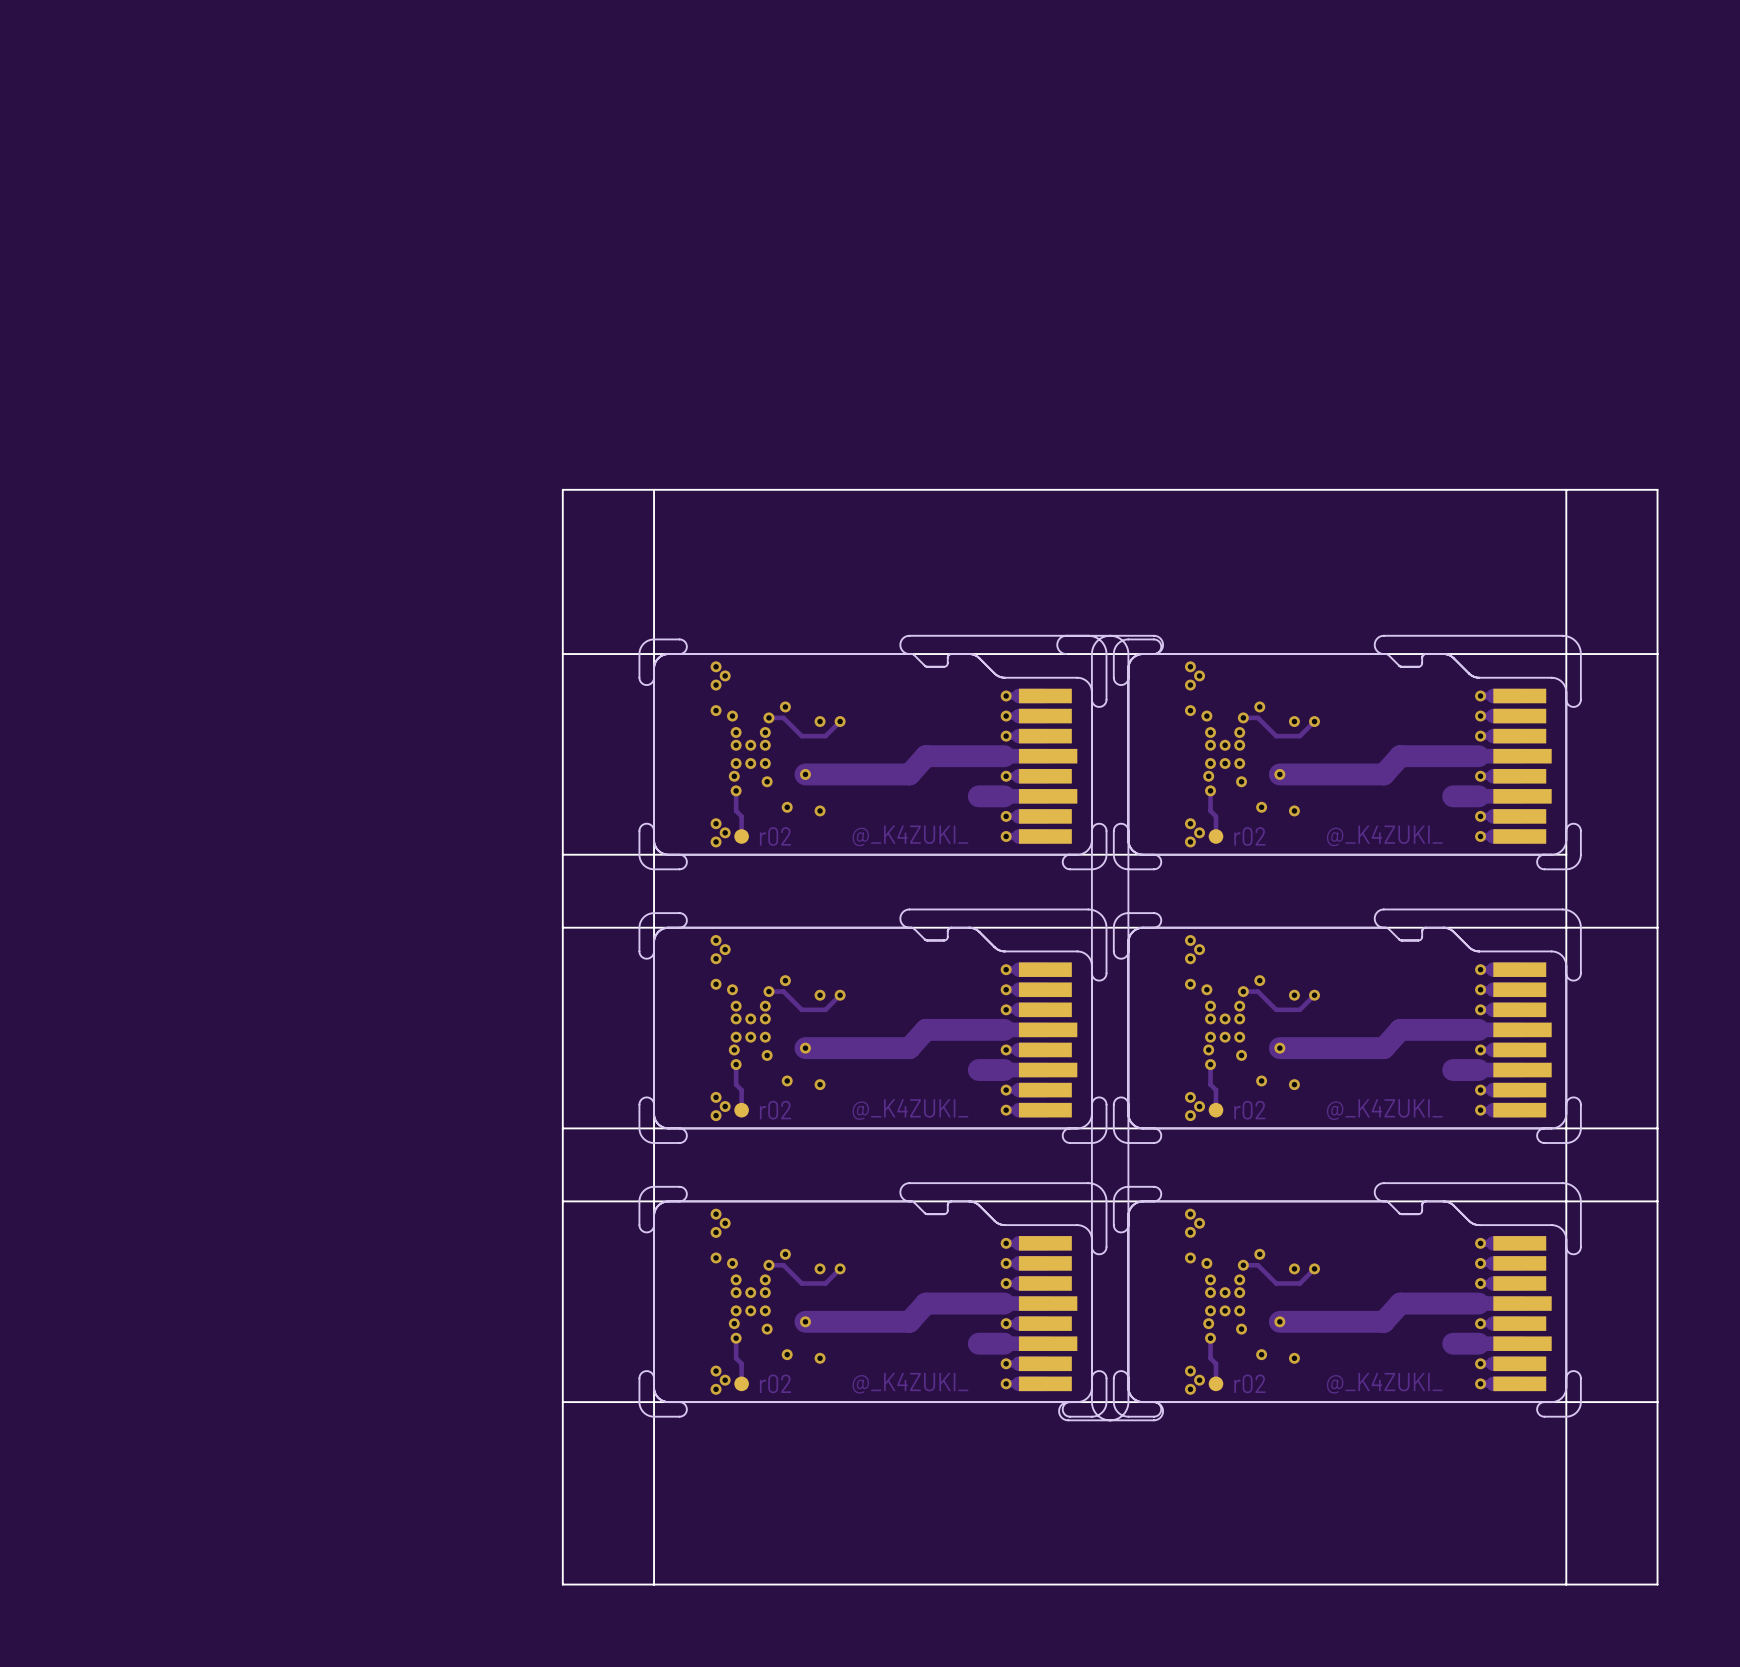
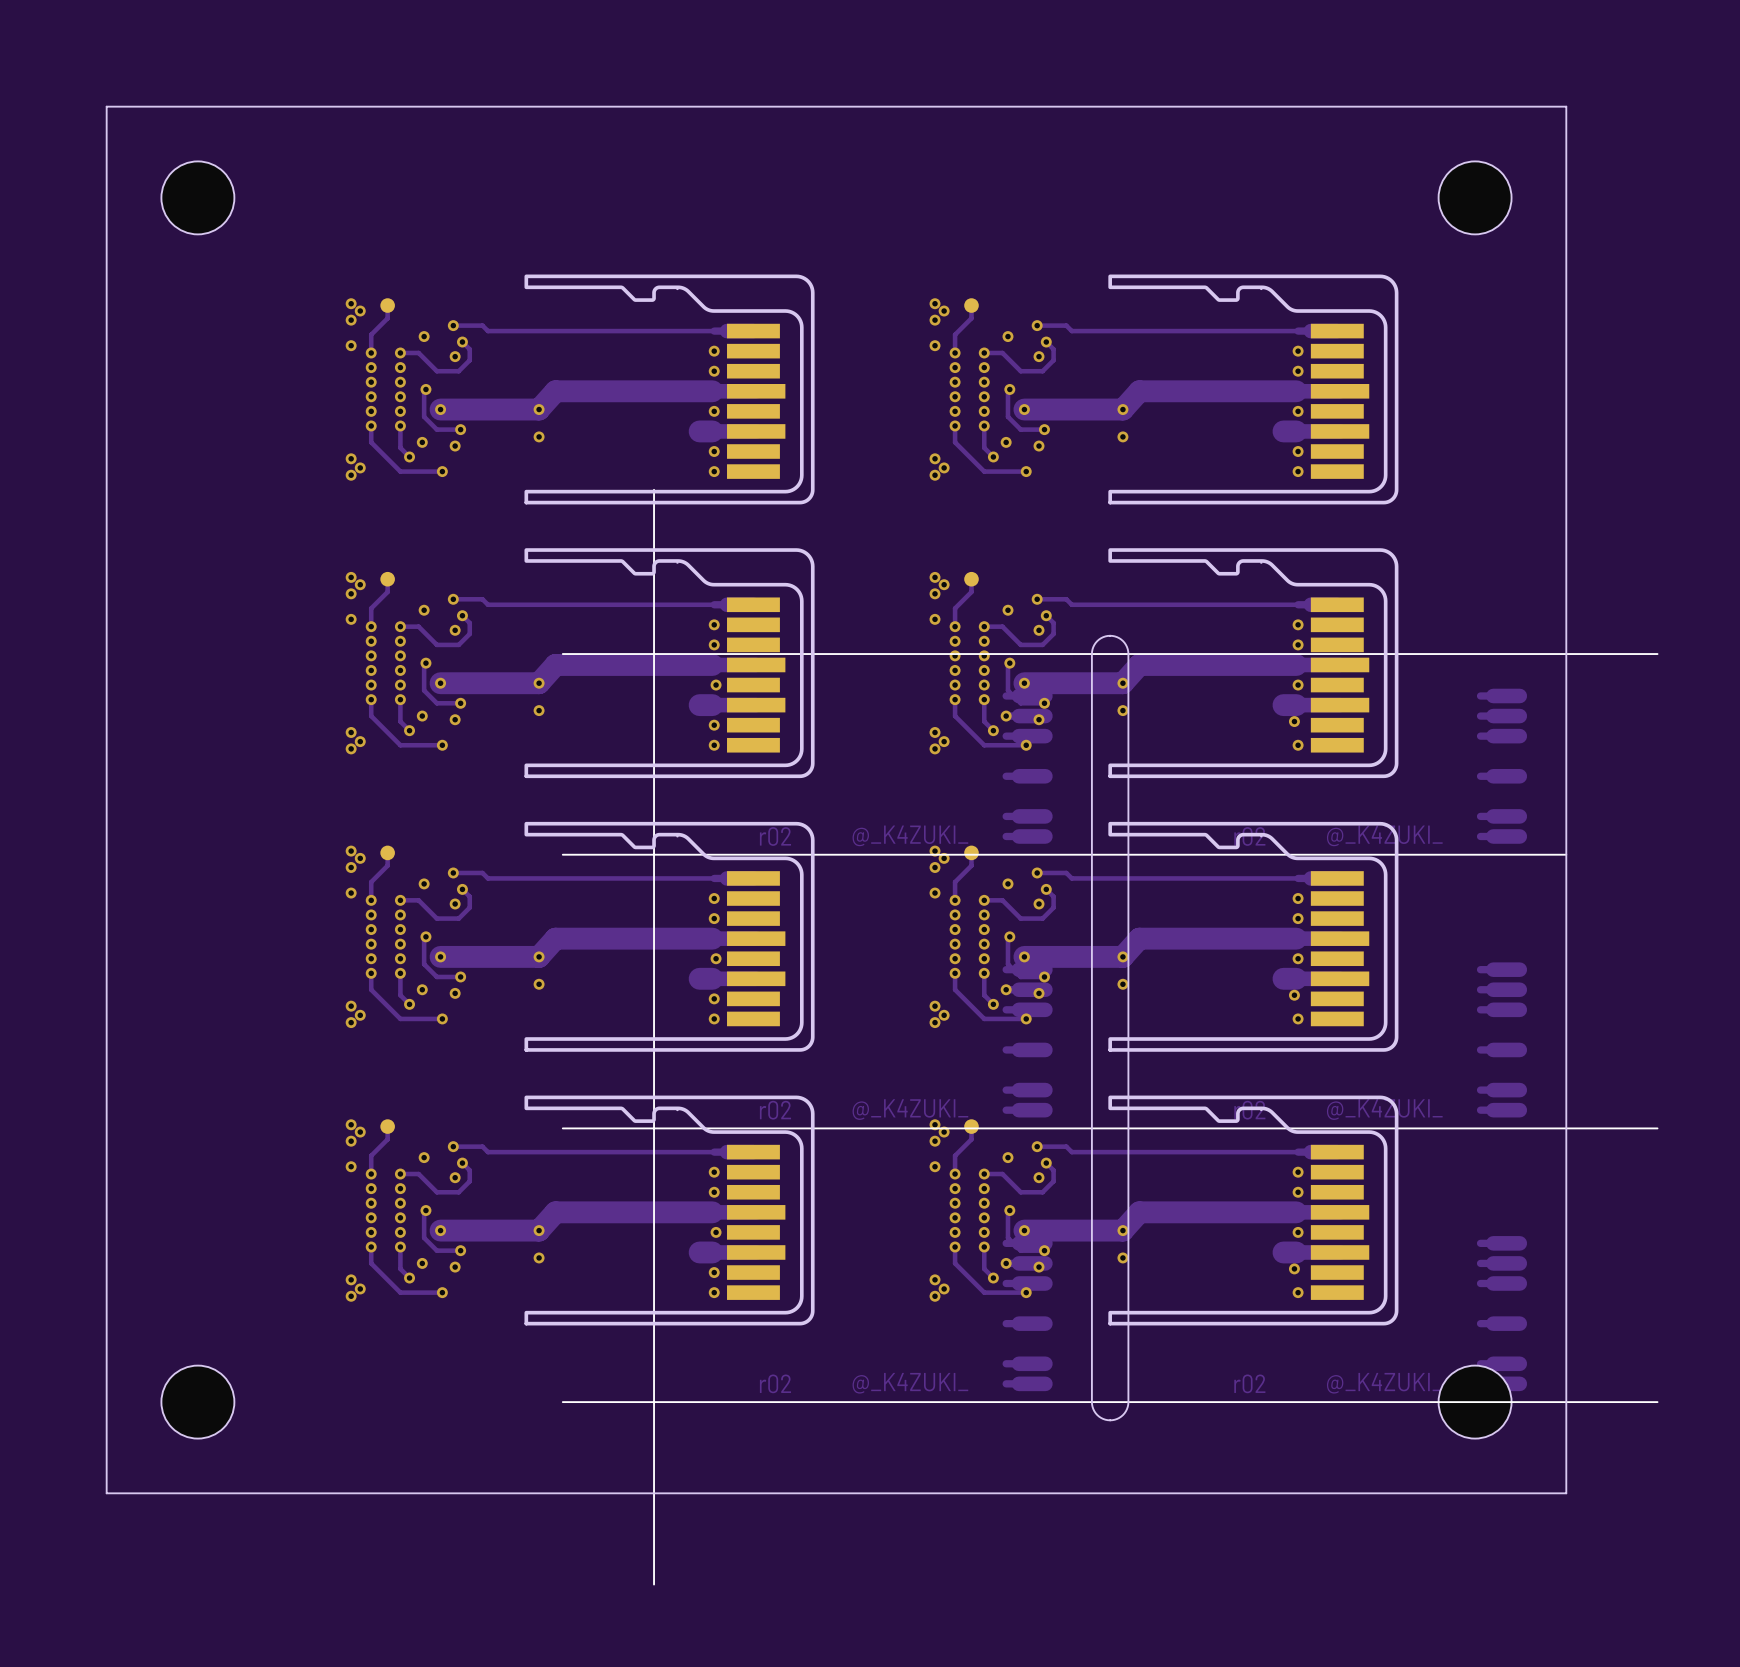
board edge: none -> (1566, 106) (1566, 1493) (106, 1493) (106, 106) (1566, 106)
hole: none -> (197, 197)
hole: none -> (1475, 197)
via: none -> (351, 303)
via: none -> (935, 303)
track: none -> (387, 305) (387, 318) (371, 334) (371, 352)
part: none -> (387, 305)
track: none -> (971, 305) (971, 318) (955, 334) (955, 352)
part: none -> (971, 305)
via: none -> (360, 311)
via: none -> (944, 311)
via: none -> (351, 320)
via: none -> (935, 320)
track: none -> (453, 325) (482, 325) (487, 331) (753, 331)
via: none -> (453, 325)
track: none -> (1037, 325) (1066, 325) (1071, 331) (1337, 331)
via: none -> (1037, 325)
via: none -> (424, 336)
via: none -> (1007, 336)
track: none -> (462, 342) (469, 349) (469, 360) (458, 371) (436, 371) (418, 352) (400, 352)
via: none -> (462, 342)
track: none -> (1046, 342) (1053, 349) (1053, 360) (1042, 371) (1020, 371) (1002, 352) (984, 352)
via: none -> (1046, 342)
via: none -> (351, 345)
via: none -> (935, 345)
via: none -> (714, 351)
via: none -> (1298, 351)
via: none -> (371, 352)
via: none -> (400, 352)
via: none -> (955, 352)
via: none -> (984, 352)
via: none -> (455, 356)
via: none -> (1039, 356)
via: none -> (371, 367)
via: none -> (400, 367)
via: none -> (955, 367)
via: none -> (984, 367)
via: none -> (714, 371)
via: none -> (1298, 371)
via: none -> (371, 382)
via: none -> (400, 382)
via: none -> (955, 382)
via: none -> (984, 382)
track: none -> (425, 389) (424, 391) (424, 416) (436, 429) (460, 429)
via: none -> (425, 389)
part: none -> (669, 389)
track: none -> (1009, 389) (1007, 391) (1007, 416) (1020, 429) (1044, 429)
via: none -> (1009, 389)
part: none -> (1253, 389)
track: none -> (756, 391) (555, 391) (539, 409) (440, 409)
track: none -> (1340, 391) (1139, 391) (1122, 409) (1024, 409)
via: none -> (371, 396)
via: none -> (400, 396)
via: none -> (955, 396)
via: none -> (984, 396)
via: none -> (440, 409)
via: none -> (539, 409)
via: none -> (1024, 409)
via: none -> (1122, 409)
via: none -> (371, 411)
via: none -> (400, 411)
via: none -> (714, 411)
via: none -> (955, 411)
via: none -> (984, 411)
via: none -> (1298, 411)
track: none -> (371, 425) (371, 442) (400, 471) (442, 471)
via: none -> (371, 425)
track: none -> (400, 425) (400, 447) (409, 456)
via: none -> (400, 425)
track: none -> (955, 425) (955, 442) (984, 471) (1026, 471)
via: none -> (955, 425)
track: none -> (984, 425) (984, 447) (993, 456)
via: none -> (984, 425)
via: none -> (460, 429)
via: none -> (1044, 429)
track: none -> (756, 431) (699, 431)
track: none -> (1340, 431) (1283, 431)
via: none -> (539, 436)
via: none -> (1122, 436)
via: none -> (422, 442)
via: none -> (1006, 442)
via: none -> (455, 446)
via: none -> (1039, 446)
via: none -> (714, 451)
via: none -> (1298, 451)
via: none -> (409, 456)
via: none -> (993, 456)
via: none -> (351, 458)
via: none -> (935, 458)
via: none -> (360, 467)
via: none -> (944, 467)
via: none -> (442, 471)
via: none -> (714, 471)
via: none -> (1026, 471)
via: none -> (1298, 471)
via: none -> (351, 475)
via: none -> (935, 475)
line: (1566, 489) (1566, 1584) -> none
line: (1657, 489) (562, 489) (562, 1584) (1657, 1584) (1657, 489) -> none
via: none -> (351, 577)
via: none -> (935, 577)
track: none -> (387, 579) (387, 591) (371, 608) (371, 626)
part: none -> (387, 579)
track: none -> (971, 579) (971, 591) (955, 608) (955, 626)
part: none -> (971, 579)
via: none -> (360, 584)
via: none -> (944, 584)
via: none -> (351, 593)
via: none -> (935, 593)
track: none -> (453, 599) (482, 599) (487, 604) (753, 604)
via: none -> (453, 599)
track: none -> (1037, 599) (1066, 599) (1071, 604) (1337, 604)
via: none -> (1037, 599)
via: none -> (424, 610)
via: none -> (1007, 610)
track: none -> (462, 615) (469, 623) (469, 633) (458, 644) (436, 644) (418, 626) (400, 626)
via: none -> (462, 615)
track: none -> (1046, 615) (1053, 623) (1053, 633) (1042, 644) (1020, 644) (1002, 626) (984, 626)
via: none -> (1046, 615)
via: none -> (351, 619)
via: none -> (935, 619)
via: none -> (714, 624)
via: none -> (1298, 624)
via: none -> (371, 626)
via: none -> (400, 626)
via: none -> (955, 626)
via: none -> (984, 626)
via: none -> (455, 630)
via: none -> (1039, 630)
via: none -> (371, 641)
via: none -> (400, 641)
via: none -> (955, 641)
via: none -> (984, 641)
via: none -> (714, 644)
via: none -> (1298, 644)
board edge: (1153, 654) (1160, 651) (1163, 644) (1160, 638) (1153, 635) (1064, 636) (1059, 639) (1057, 646) (1059, 651) (1066, 654) -> none
via: none -> (371, 655)
via: none -> (400, 655)
via: none -> (955, 655)
via: none -> (984, 655)
track: none -> (425, 663) (424, 664) (424, 690) (436, 703) (460, 703)
via: none -> (425, 663)
part: none -> (669, 663)
track: none -> (1009, 663) (1007, 664) (1007, 690) (1020, 703) (1044, 703)
via: none -> (1009, 663)
part: none -> (1253, 663)
track: none -> (756, 664) (555, 664) (539, 683) (440, 683)
track: none -> (1340, 664) (1139, 664) (1122, 683) (1024, 683)
via: (716, 666) -> none
via: (1190, 666) -> none
via: none -> (371, 670)
via: none -> (400, 670)
via: none -> (955, 670)
via: none -> (984, 670)
via: (725, 675) -> none
via: (1199, 675) -> none
via: none -> (440, 683)
via: none -> (539, 683)
via: none -> (1024, 683)
via: none -> (1122, 683)
via: none -> (371, 685)
via: none -> (400, 685)
via: none -> (955, 685)
via: none -> (984, 685)
via: (1190, 685) -> none
via: none -> (1298, 685)
via: (1006, 695) -> none
via: (1480, 695) -> none
track: none -> (371, 699) (371, 716) (400, 745) (442, 745)
via: none -> (371, 699)
track: none -> (400, 699) (400, 721) (409, 730)
via: none -> (400, 699)
track: none -> (955, 699) (955, 716) (984, 745) (1026, 745)
via: none -> (955, 699)
track: none -> (984, 699) (984, 721) (993, 730)
via: none -> (984, 699)
via: none -> (460, 703)
via: none -> (1044, 703)
track: none -> (756, 705) (699, 705)
track: none -> (1340, 705) (1283, 705)
via: (785, 706) -> none
via: (1259, 706) -> none
via: none -> (539, 710)
via: (716, 710) -> none
via: none -> (1122, 710)
via: (1190, 710) -> none
via: none -> (422, 716)
via: (732, 716) -> none
via: (1206, 716) -> none
via: (1480, 716) -> none
track: (768, 717) (783, 717) (801, 736) (825, 736) (840, 721) -> none
via: (768, 717) -> none
track: (1243, 717) (1257, 717) (1276, 736) (1299, 736) (1314, 721) -> none
via: (1243, 717) -> none
via: none -> (455, 719)
via: none -> (1039, 719)
via: (820, 721) -> none
via: (840, 721) -> none
via: (1314, 721) -> none
via: none -> (714, 725)
via: none -> (409, 730)
via: none -> (993, 730)
via: none -> (351, 732)
via: (736, 732) -> none
via: (765, 732) -> none
via: none -> (935, 732)
via: (1210, 732) -> none
via: (1239, 732) -> none
via: (1006, 736) -> none
via: (1480, 736) -> none
via: none -> (360, 741)
via: none -> (944, 741)
via: none -> (442, 745)
via: none -> (714, 745)
via: (736, 745) -> none
via: (750, 745) -> none
via: (765, 745) -> none
via: none -> (1026, 745)
via: (1210, 745) -> none
via: (1225, 745) -> none
via: (1239, 745) -> none
via: none -> (1298, 745)
via: none -> (351, 748)
via: none -> (935, 748)
part: (872, 752) -> none
part: (1347, 752) -> none
track: (1048, 756) (925, 756) (909, 774) (805, 774) -> none
track: (1522, 756) (1400, 756) (1383, 774) (1279, 774) -> none
via: (736, 763) -> none
via: (750, 763) -> none
via: (765, 763) -> none
via: (1210, 763) -> none
via: (1225, 763) -> none
via: (1239, 763) -> none
via: (805, 774) -> none
via: (1279, 774) -> none
via: (734, 776) -> none
via: (1006, 776) -> none
via: (1208, 776) -> none
via: (1480, 776) -> none
via: (767, 781) -> none
via: (1241, 781) -> none
track: (736, 790) (736, 810) (741, 816) (741, 836) -> none
via: (736, 790) -> none
track: (1210, 790) (1210, 810) (1215, 816) (1215, 836) -> none
via: (1210, 790) -> none
track: (1048, 796) (978, 796) -> none
track: (1522, 796) (1453, 796) -> none
via: (787, 807) -> none
via: (1261, 807) -> none
via: (820, 810) -> none
via: (1294, 810) -> none
via: (1006, 816) -> none
via: (1480, 816) -> none
via: (716, 823) -> none
via: (1190, 823) -> none
via: (725, 832) -> none
via: (1199, 832) -> none
part: (741, 836) -> none
via: (1006, 836) -> none
part: (1215, 836) -> none
via: (1480, 836) -> none
via: (716, 841) -> none
via: (1190, 841) -> none
via: none -> (351, 851)
via: none -> (935, 851)
track: none -> (387, 852) (387, 865) (371, 882) (371, 900)
part: none -> (387, 852)
track: none -> (971, 852) (971, 865) (955, 882) (955, 900)
part: none -> (971, 852)
via: none -> (360, 858)
via: none -> (944, 858)
via: none -> (351, 867)
via: none -> (935, 867)
track: none -> (453, 872) (482, 872) (487, 878) (753, 878)
via: none -> (453, 872)
track: none -> (1037, 872) (1066, 872) (1071, 878) (1337, 878)
via: none -> (1037, 872)
via: none -> (424, 883)
via: none -> (1007, 883)
track: none -> (462, 889) (469, 896) (469, 907) (458, 918) (436, 918) (418, 900) (400, 900)
via: none -> (462, 889)
track: none -> (1046, 889) (1053, 896) (1053, 907) (1042, 918) (1020, 918) (1002, 900) (984, 900)
via: none -> (1046, 889)
via: none -> (351, 893)
via: none -> (935, 893)
via: none -> (714, 898)
via: none -> (1298, 898)
via: none -> (371, 900)
via: none -> (400, 900)
via: none -> (955, 900)
via: none -> (984, 900)
via: none -> (455, 903)
via: none -> (1039, 903)
via: none -> (371, 914)
via: none -> (400, 914)
via: none -> (955, 914)
via: none -> (984, 914)
via: none -> (714, 918)
via: none -> (1298, 918)
line: (1657, 927) (562, 927) -> none
via: none -> (371, 929)
via: none -> (400, 929)
via: none -> (955, 929)
via: none -> (984, 929)
track: none -> (425, 936) (424, 938) (424, 964) (436, 976) (460, 976)
via: none -> (425, 936)
part: none -> (669, 936)
track: none -> (1009, 936) (1007, 938) (1007, 964) (1020, 976) (1044, 976)
via: none -> (1009, 936)
part: none -> (1253, 936)
track: none -> (756, 938) (555, 938) (539, 956) (440, 956)
track: none -> (1340, 938) (1139, 938) (1122, 956) (1024, 956)
via: (716, 940) -> none
via: (1190, 940) -> none
via: none -> (371, 944)
via: none -> (400, 944)
via: none -> (955, 944)
via: none -> (984, 944)
via: (725, 949) -> none
via: (1199, 949) -> none
via: none -> (440, 956)
via: none -> (539, 956)
via: none -> (1024, 956)
via: none -> (1122, 956)
via: none -> (371, 958)
via: none -> (400, 958)
via: none -> (955, 958)
via: none -> (984, 958)
via: (1190, 958) -> none
via: none -> (1298, 958)
via: (1006, 969) -> none
via: (1480, 969) -> none
track: none -> (371, 973) (371, 989) (400, 1018) (442, 1018)
via: none -> (371, 973)
track: none -> (400, 973) (400, 995) (409, 1004)
via: none -> (400, 973)
track: none -> (955, 973) (955, 989) (984, 1018) (1026, 1018)
via: none -> (955, 973)
track: none -> (984, 973) (984, 995) (993, 1004)
via: none -> (984, 973)
via: none -> (460, 976)
via: none -> (1044, 976)
track: none -> (756, 978) (699, 978)
track: none -> (1340, 978) (1283, 978)
via: (785, 980) -> none
via: (1259, 980) -> none
via: none -> (539, 984)
via: (716, 984) -> none
via: none -> (1122, 984)
via: (1190, 984) -> none
via: none -> (422, 989)
via: (732, 989) -> none
via: (1206, 989) -> none
via: (1480, 989) -> none
track: (768, 991) (783, 991) (801, 1009) (825, 1009) (840, 995) -> none
via: (768, 991) -> none
track: (1243, 991) (1257, 991) (1276, 1009) (1299, 1009) (1314, 995) -> none
via: (1243, 991) -> none
via: none -> (455, 993)
via: none -> (1039, 993)
via: (820, 995) -> none
via: (840, 995) -> none
via: (1314, 995) -> none
via: none -> (714, 998)
via: none -> (409, 1004)
via: none -> (993, 1004)
via: none -> (351, 1006)
via: (736, 1006) -> none
via: (765, 1006) -> none
via: none -> (935, 1006)
via: (1210, 1006) -> none
via: (1239, 1006) -> none
via: (1006, 1009) -> none
via: (1480, 1009) -> none
via: none -> (360, 1015)
via: none -> (944, 1015)
via: none -> (442, 1018)
via: none -> (714, 1018)
via: (736, 1018) -> none
via: (750, 1018) -> none
via: (765, 1018) -> none
via: none -> (1026, 1018)
via: (1210, 1018) -> none
via: (1225, 1018) -> none
via: (1239, 1018) -> none
via: none -> (1298, 1018)
via: none -> (351, 1022)
via: none -> (935, 1022)
part: (872, 1026) -> none
part: (1347, 1026) -> none
track: (1048, 1029) (925, 1029) (909, 1048) (805, 1048) -> none
track: (1522, 1029) (1400, 1029) (1383, 1048) (1279, 1048) -> none
via: (736, 1037) -> none
via: (750, 1037) -> none
via: (765, 1037) -> none
via: (1210, 1037) -> none
via: (1225, 1037) -> none
via: (1239, 1037) -> none
via: (805, 1048) -> none
via: (1279, 1048) -> none
via: (734, 1049) -> none
via: (1006, 1049) -> none
via: (1208, 1049) -> none
via: (1480, 1049) -> none
via: (767, 1055) -> none
via: (1241, 1055) -> none
track: (736, 1064) (736, 1084) (741, 1090) (741, 1110) -> none
via: (736, 1064) -> none
track: (1210, 1064) (1210, 1084) (1215, 1090) (1215, 1110) -> none
via: (1210, 1064) -> none
track: (1048, 1070) (978, 1070) -> none
track: (1522, 1070) (1453, 1070) -> none
via: (787, 1080) -> none
via: (1261, 1080) -> none
via: (820, 1084) -> none
via: (1294, 1084) -> none
via: (1006, 1090) -> none
via: (1480, 1090) -> none
via: (716, 1097) -> none
via: (1190, 1097) -> none
via: (725, 1106) -> none
via: (1199, 1106) -> none
part: (741, 1110) -> none
via: (1006, 1110) -> none
part: (1215, 1110) -> none
via: (1480, 1110) -> none
via: (716, 1115) -> none
via: (1190, 1115) -> none
via: none -> (351, 1124)
via: none -> (935, 1124)
track: none -> (387, 1126) (387, 1139) (371, 1155) (371, 1174)
part: none -> (387, 1126)
track: none -> (971, 1126) (971, 1139) (955, 1155) (955, 1174)
part: none -> (971, 1126)
via: none -> (360, 1132)
via: none -> (944, 1132)
via: none -> (351, 1141)
via: none -> (935, 1141)
track: none -> (453, 1146) (482, 1146) (487, 1152) (753, 1152)
via: none -> (453, 1146)
track: none -> (1037, 1146) (1066, 1146) (1071, 1152) (1337, 1152)
via: none -> (1037, 1146)
via: none -> (424, 1157)
via: none -> (1007, 1157)
track: none -> (462, 1163) (469, 1170) (469, 1181) (458, 1192) (436, 1192) (418, 1174) (400, 1174)
via: none -> (462, 1163)
track: none -> (1046, 1163) (1053, 1170) (1053, 1181) (1042, 1192) (1020, 1192) (1002, 1174) (984, 1174)
via: none -> (1046, 1163)
via: none -> (351, 1166)
via: none -> (935, 1166)
via: none -> (714, 1172)
via: none -> (1298, 1172)
via: none -> (371, 1174)
via: none -> (400, 1174)
via: none -> (955, 1174)
via: none -> (984, 1174)
via: none -> (455, 1177)
via: none -> (1039, 1177)
via: none -> (371, 1188)
via: none -> (400, 1188)
via: none -> (955, 1188)
via: none -> (984, 1188)
via: none -> (714, 1192)
via: none -> (1298, 1192)
line: (1657, 1201) (562, 1201) -> none
via: none -> (371, 1203)
via: none -> (400, 1203)
via: none -> (955, 1203)
via: none -> (984, 1203)
track: none -> (425, 1210) (424, 1212) (424, 1237) (436, 1250) (460, 1250)
via: none -> (425, 1210)
part: none -> (669, 1210)
track: none -> (1009, 1210) (1007, 1212) (1007, 1237) (1020, 1250) (1044, 1250)
via: none -> (1009, 1210)
part: none -> (1253, 1210)
track: none -> (756, 1212) (555, 1212) (539, 1230) (440, 1230)
track: none -> (1340, 1212) (1139, 1212) (1122, 1230) (1024, 1230)
via: (716, 1214) -> none
via: (1190, 1214) -> none
via: none -> (371, 1217)
via: none -> (400, 1217)
via: none -> (955, 1217)
via: none -> (984, 1217)
via: (725, 1223) -> none
via: (1199, 1223) -> none
via: none -> (440, 1230)
via: none -> (539, 1230)
via: none -> (1024, 1230)
via: none -> (1122, 1230)
via: none -> (371, 1232)
via: none -> (400, 1232)
via: none -> (955, 1232)
via: none -> (984, 1232)
via: (1190, 1232) -> none
via: none -> (1298, 1232)
via: (1006, 1243) -> none
via: (1480, 1243) -> none
track: none -> (371, 1247) (371, 1263) (400, 1292) (442, 1292)
via: none -> (371, 1247)
track: none -> (400, 1247) (400, 1268) (409, 1278)
via: none -> (400, 1247)
track: none -> (955, 1247) (955, 1263) (984, 1292) (1026, 1292)
via: none -> (955, 1247)
track: none -> (984, 1247) (984, 1268) (993, 1278)
via: none -> (984, 1247)
via: none -> (460, 1250)
via: none -> (1044, 1250)
track: none -> (756, 1252) (699, 1252)
track: none -> (1340, 1252) (1283, 1252)
via: (785, 1254) -> none
via: (1259, 1254) -> none
via: none -> (539, 1257)
via: (716, 1257) -> none
via: none -> (1122, 1257)
via: (1190, 1257) -> none
via: none -> (422, 1263)
via: (732, 1263) -> none
via: (1206, 1263) -> none
via: (1480, 1263) -> none
track: (768, 1265) (783, 1265) (801, 1283) (825, 1283) (840, 1268) -> none
via: (768, 1265) -> none
track: (1243, 1265) (1257, 1265) (1276, 1283) (1299, 1283) (1314, 1268) -> none
via: (1243, 1265) -> none
via: none -> (455, 1267)
via: none -> (1039, 1267)
via: (820, 1268) -> none
via: (840, 1268) -> none
via: (1314, 1268) -> none
via: none -> (714, 1272)
via: none -> (409, 1278)
via: none -> (993, 1278)
via: none -> (351, 1279)
via: (736, 1279) -> none
via: (765, 1279) -> none
via: none -> (935, 1279)
via: (1210, 1279) -> none
via: (1239, 1279) -> none
via: (1006, 1283) -> none
via: (1480, 1283) -> none
via: none -> (360, 1288)
via: none -> (944, 1288)
via: none -> (442, 1292)
via: none -> (714, 1292)
via: (736, 1292) -> none
via: (750, 1292) -> none
via: (765, 1292) -> none
via: none -> (1026, 1292)
via: (1210, 1292) -> none
via: (1225, 1292) -> none
via: (1239, 1292) -> none
via: none -> (1298, 1292)
via: none -> (351, 1296)
via: none -> (935, 1296)
part: (872, 1299) -> none
part: (1347, 1299) -> none
track: (1048, 1303) (925, 1303) (909, 1321) (805, 1321) -> none
track: (1522, 1303) (1400, 1303) (1383, 1321) (1279, 1321) -> none
via: (736, 1310) -> none
via: (750, 1310) -> none
via: (765, 1310) -> none
via: (1210, 1310) -> none
via: (1225, 1310) -> none
via: (1239, 1310) -> none
via: (805, 1321) -> none
via: (1279, 1321) -> none
via: (734, 1323) -> none
via: (1006, 1323) -> none
via: (1208, 1323) -> none
via: (1480, 1323) -> none
via: (767, 1329) -> none
via: (1241, 1329) -> none
track: (736, 1338) (736, 1358) (741, 1363) (741, 1383) -> none
via: (736, 1338) -> none
track: (1210, 1338) (1210, 1358) (1215, 1363) (1215, 1383) -> none
via: (1210, 1338) -> none
track: (1048, 1343) (978, 1343) -> none
track: (1522, 1343) (1453, 1343) -> none
via: (787, 1354) -> none
via: (1261, 1354) -> none
via: (820, 1358) -> none
via: (1294, 1358) -> none
via: (1006, 1363) -> none
via: (1480, 1363) -> none
via: (716, 1371) -> none
via: (1190, 1371) -> none
via: (725, 1380) -> none
via: (1199, 1380) -> none
part: (741, 1383) -> none
via: (1006, 1383) -> none
part: (1215, 1383) -> none
via: (1480, 1383) -> none
via: (716, 1389) -> none
via: (1190, 1389) -> none
hole: none -> (197, 1402)
board edge: (1153, 1402) (1160, 1404) (1163, 1411) (1160, 1417) (1153, 1420) (1065, 1420) (1060, 1416) (1059, 1410) (1061, 1404) (1068, 1402) -> none
hole: none -> (1475, 1402)

